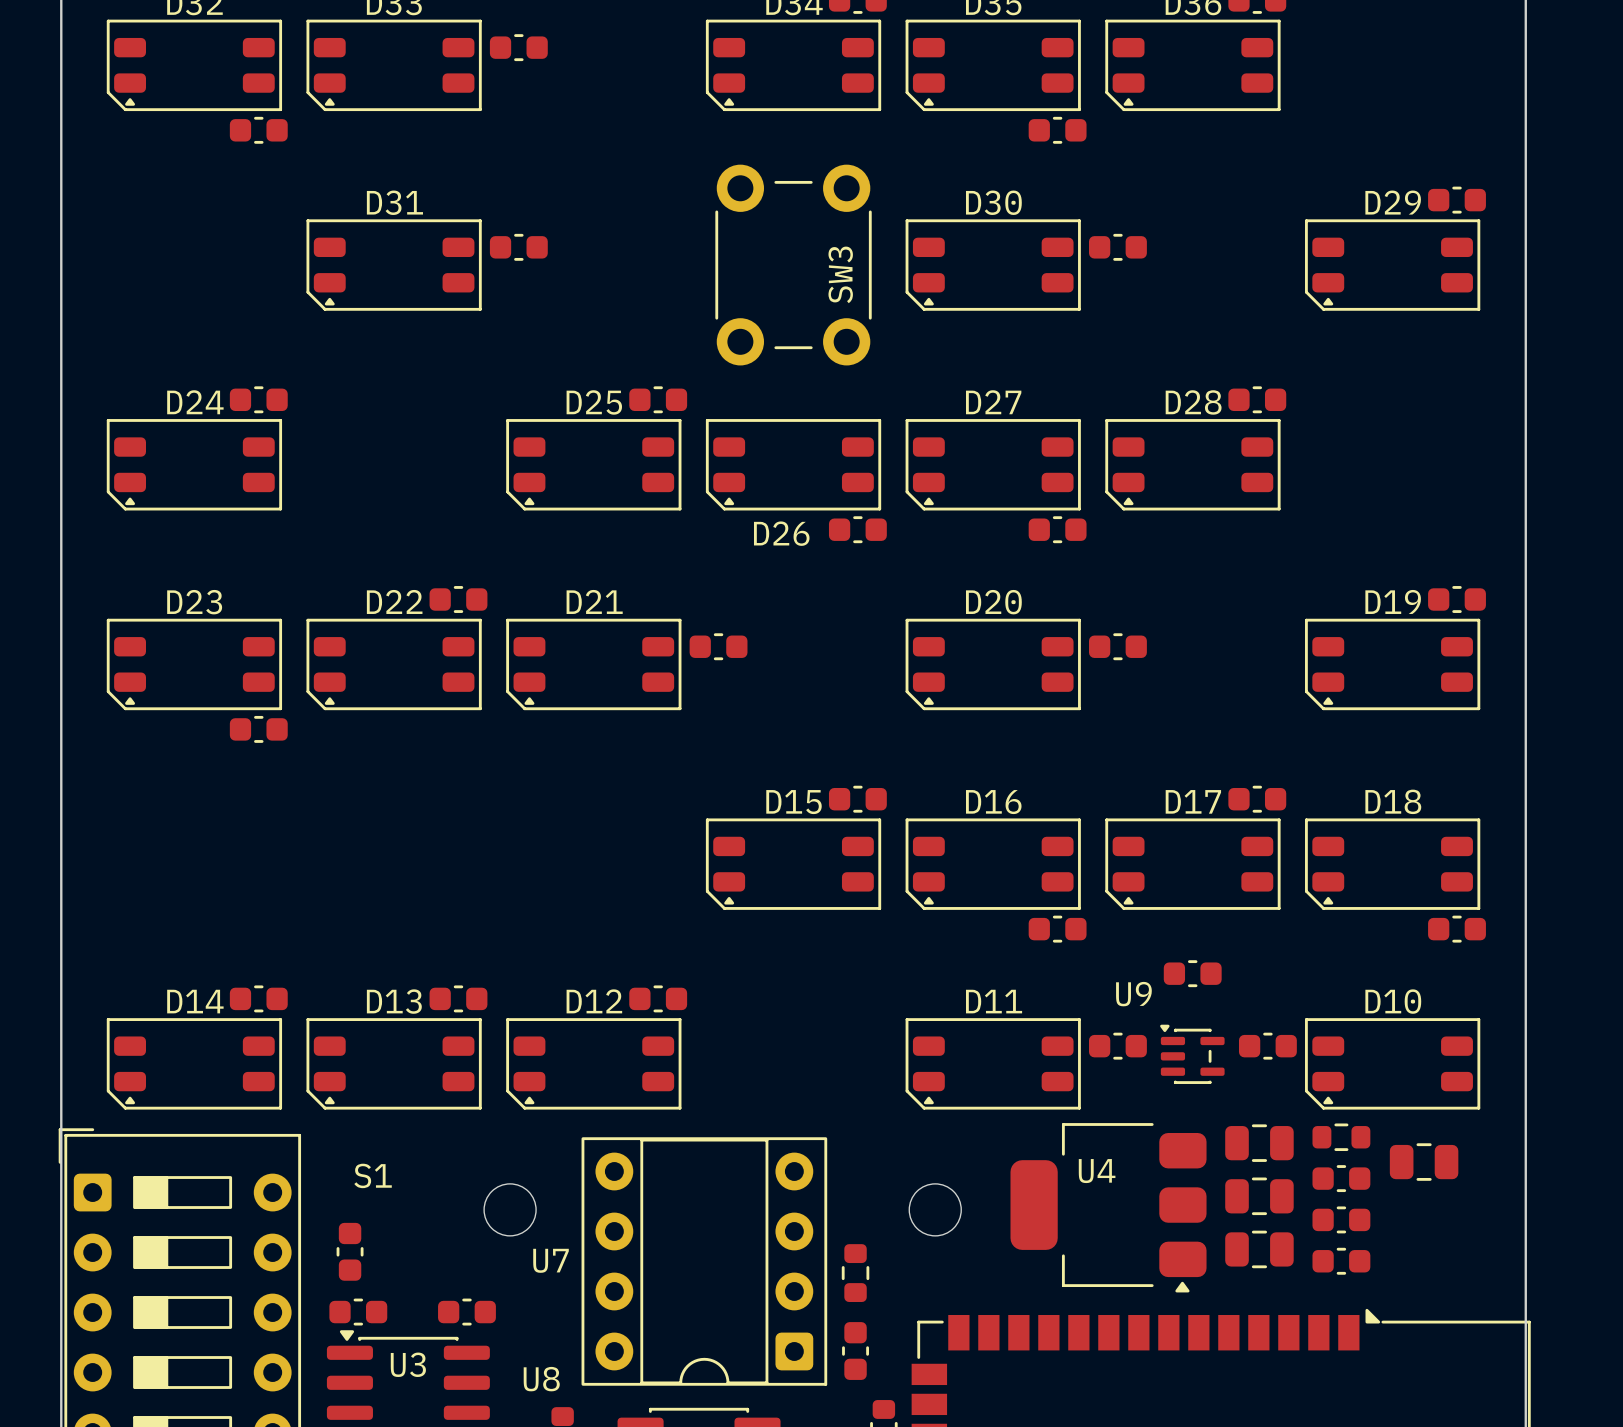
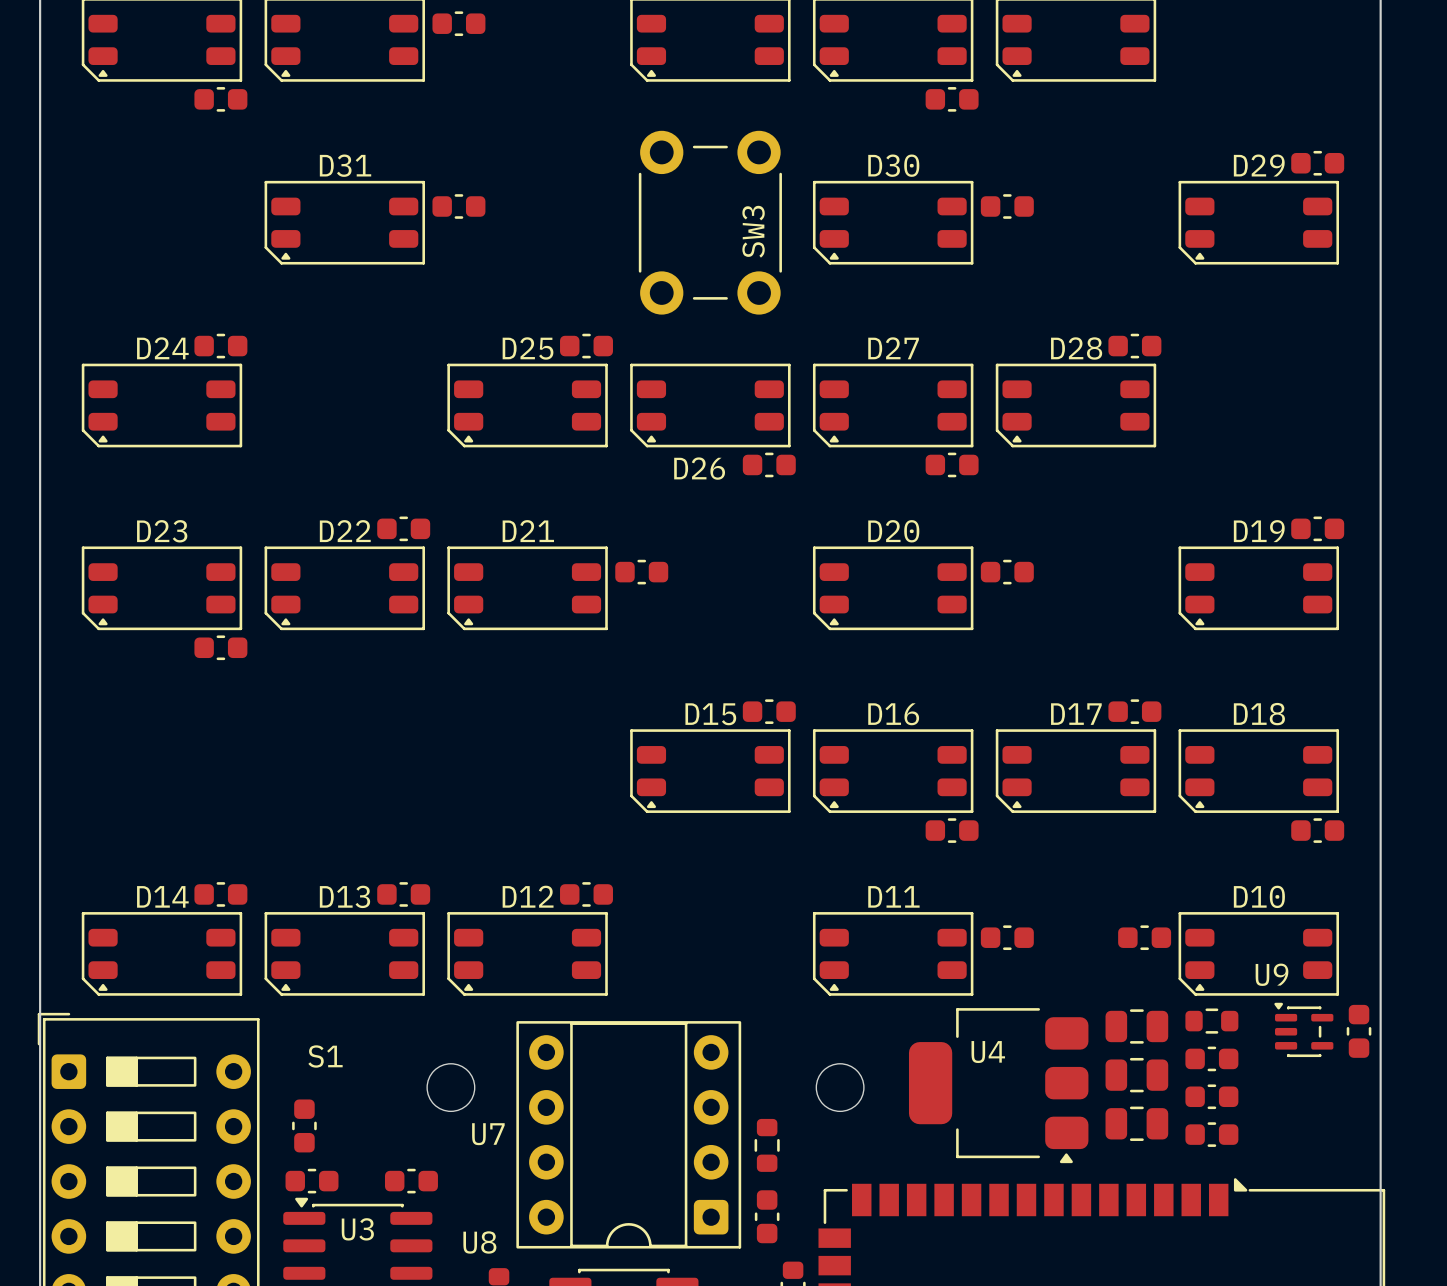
part rotation: 0° (1192, 973) -> 90° clockwise (1359, 1031)
part position: (1192, 973) -> (1359, 1031)
U9 name position: U9 (1133, 994) -> U9 (1272, 974)
U9 position: (1192, 1054) -> (1303, 1029)
part: (1424, 1162) -> none

